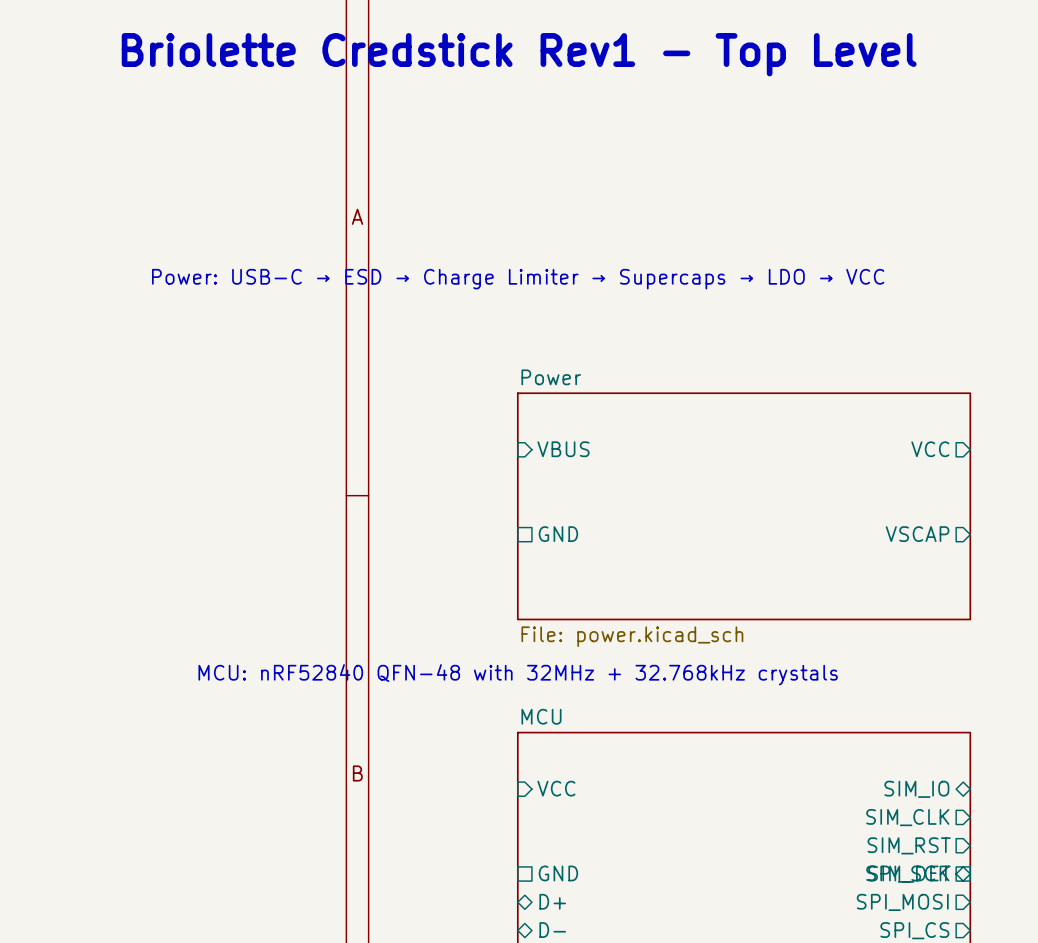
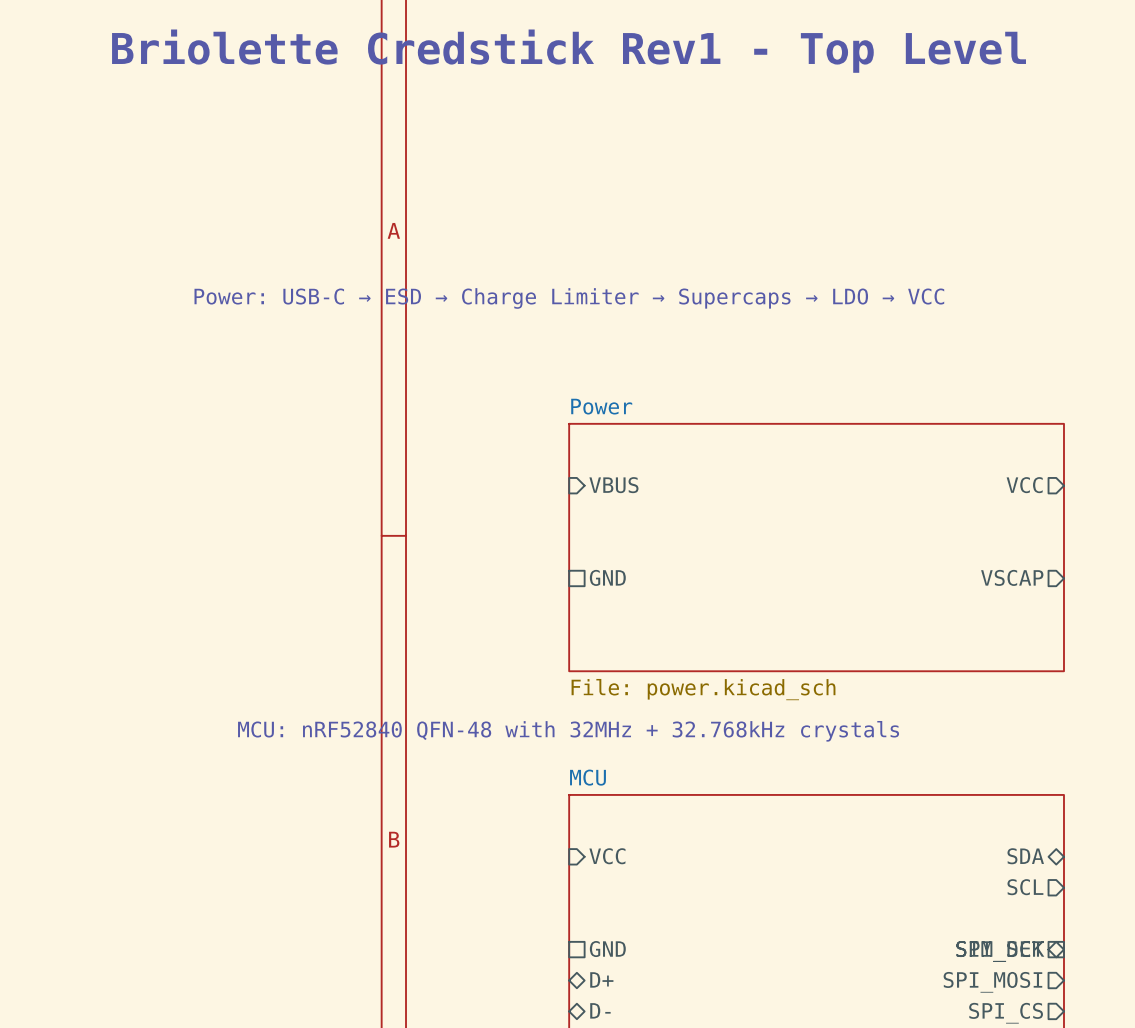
sheet pin: SIM_IO (916, 789) -> SDA (1025, 856)
sheet pin: SIM_CLK (907, 817) -> SCL (1025, 887)
sheet pin: SIM_RST (909, 845) -> none

